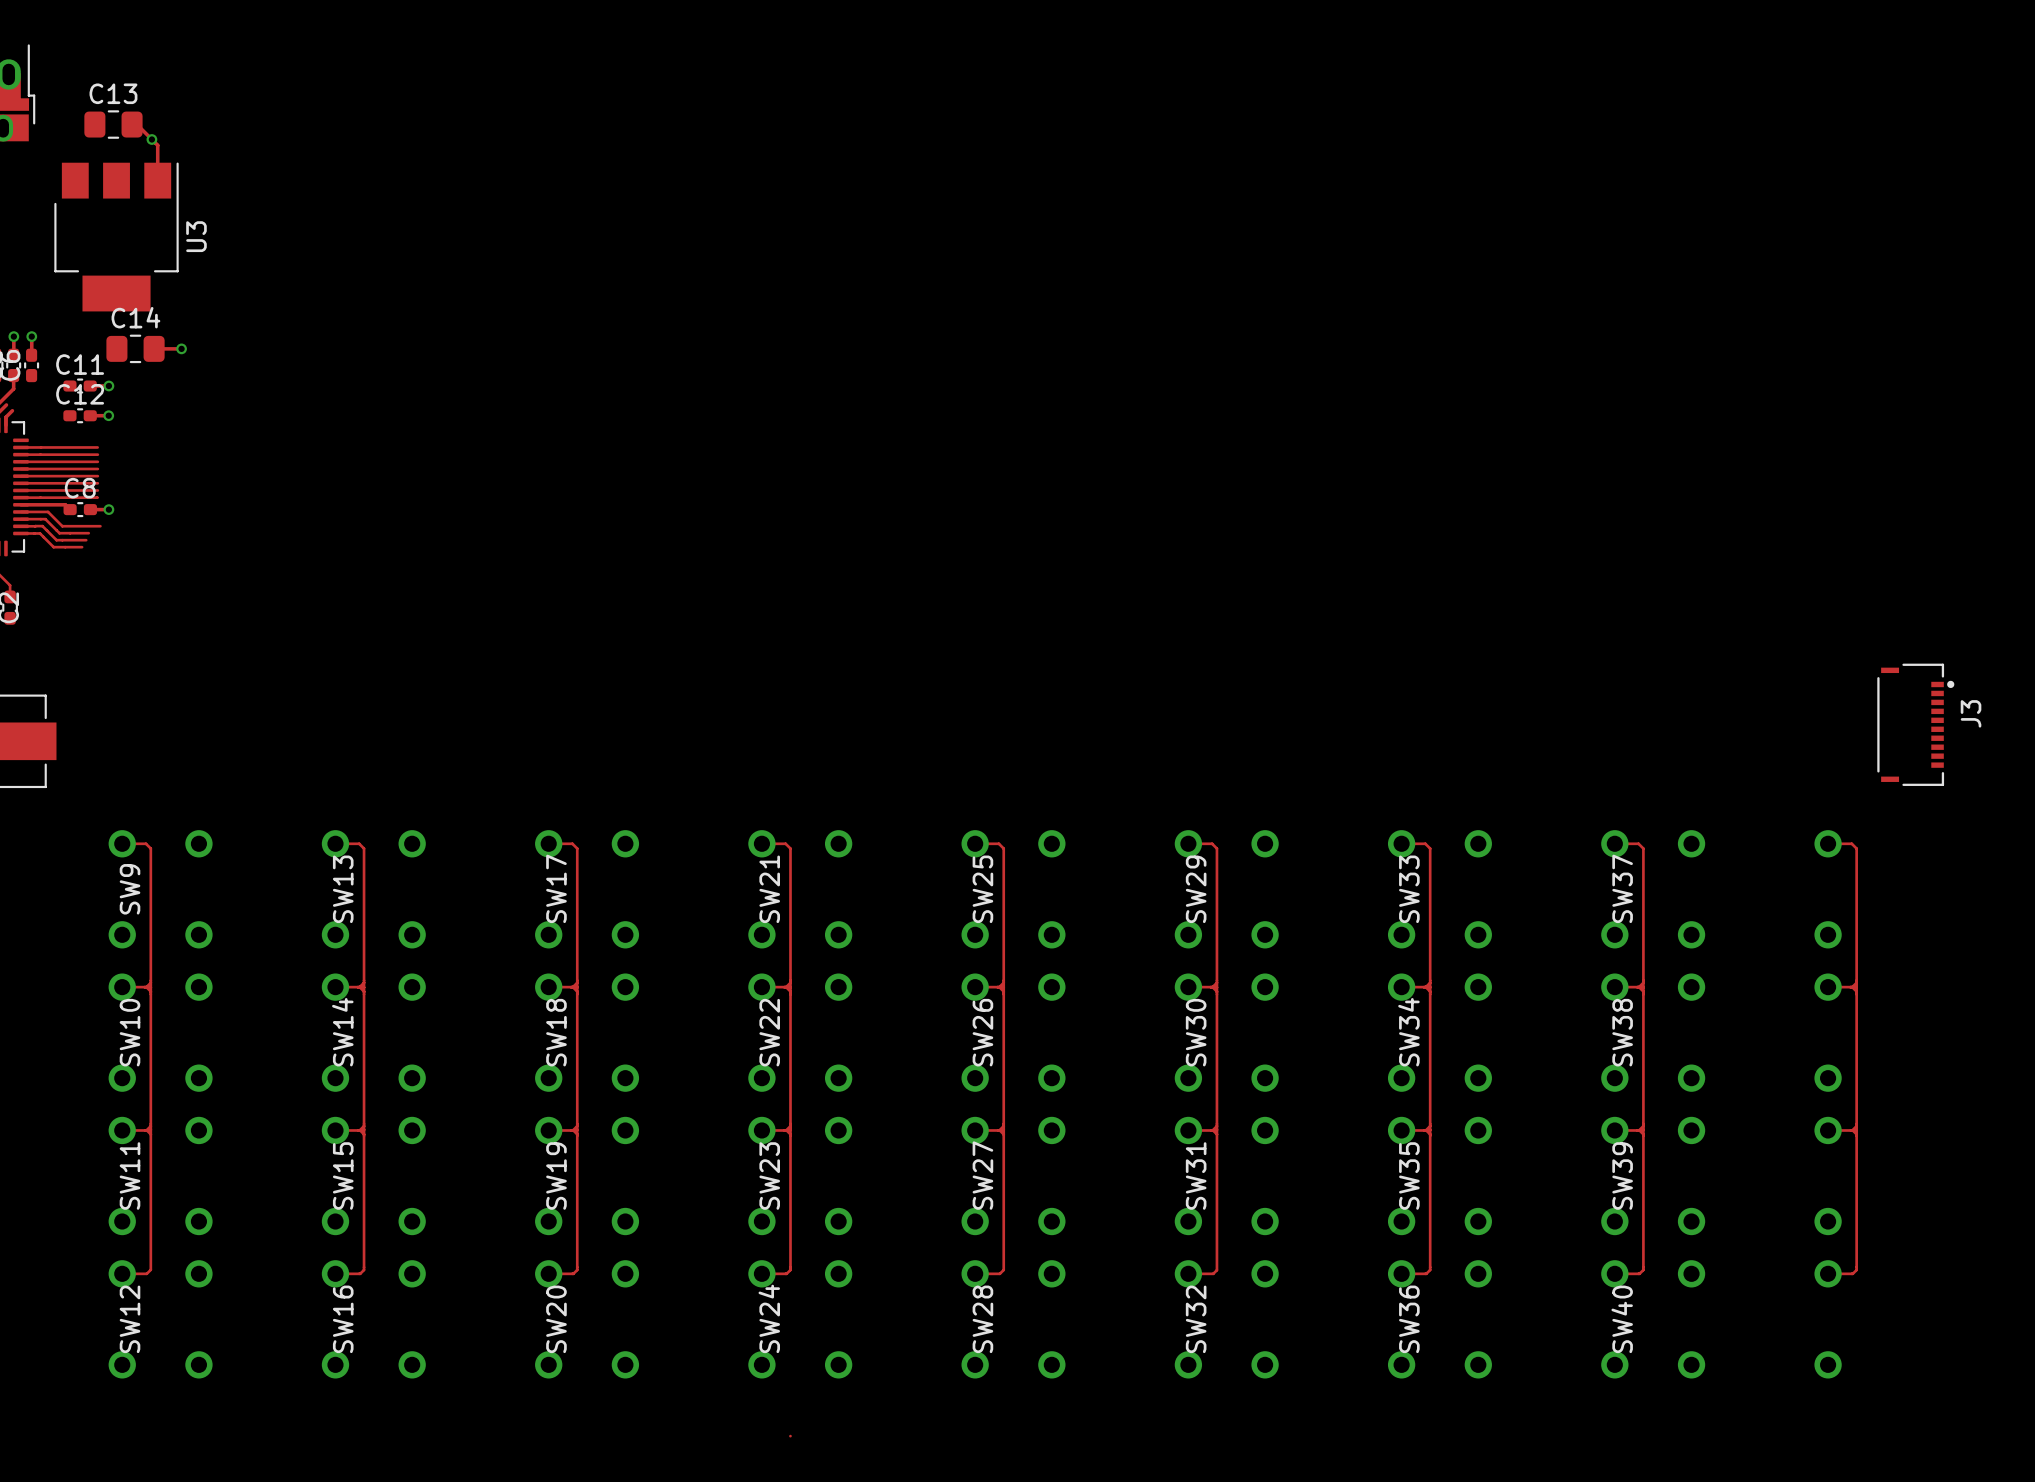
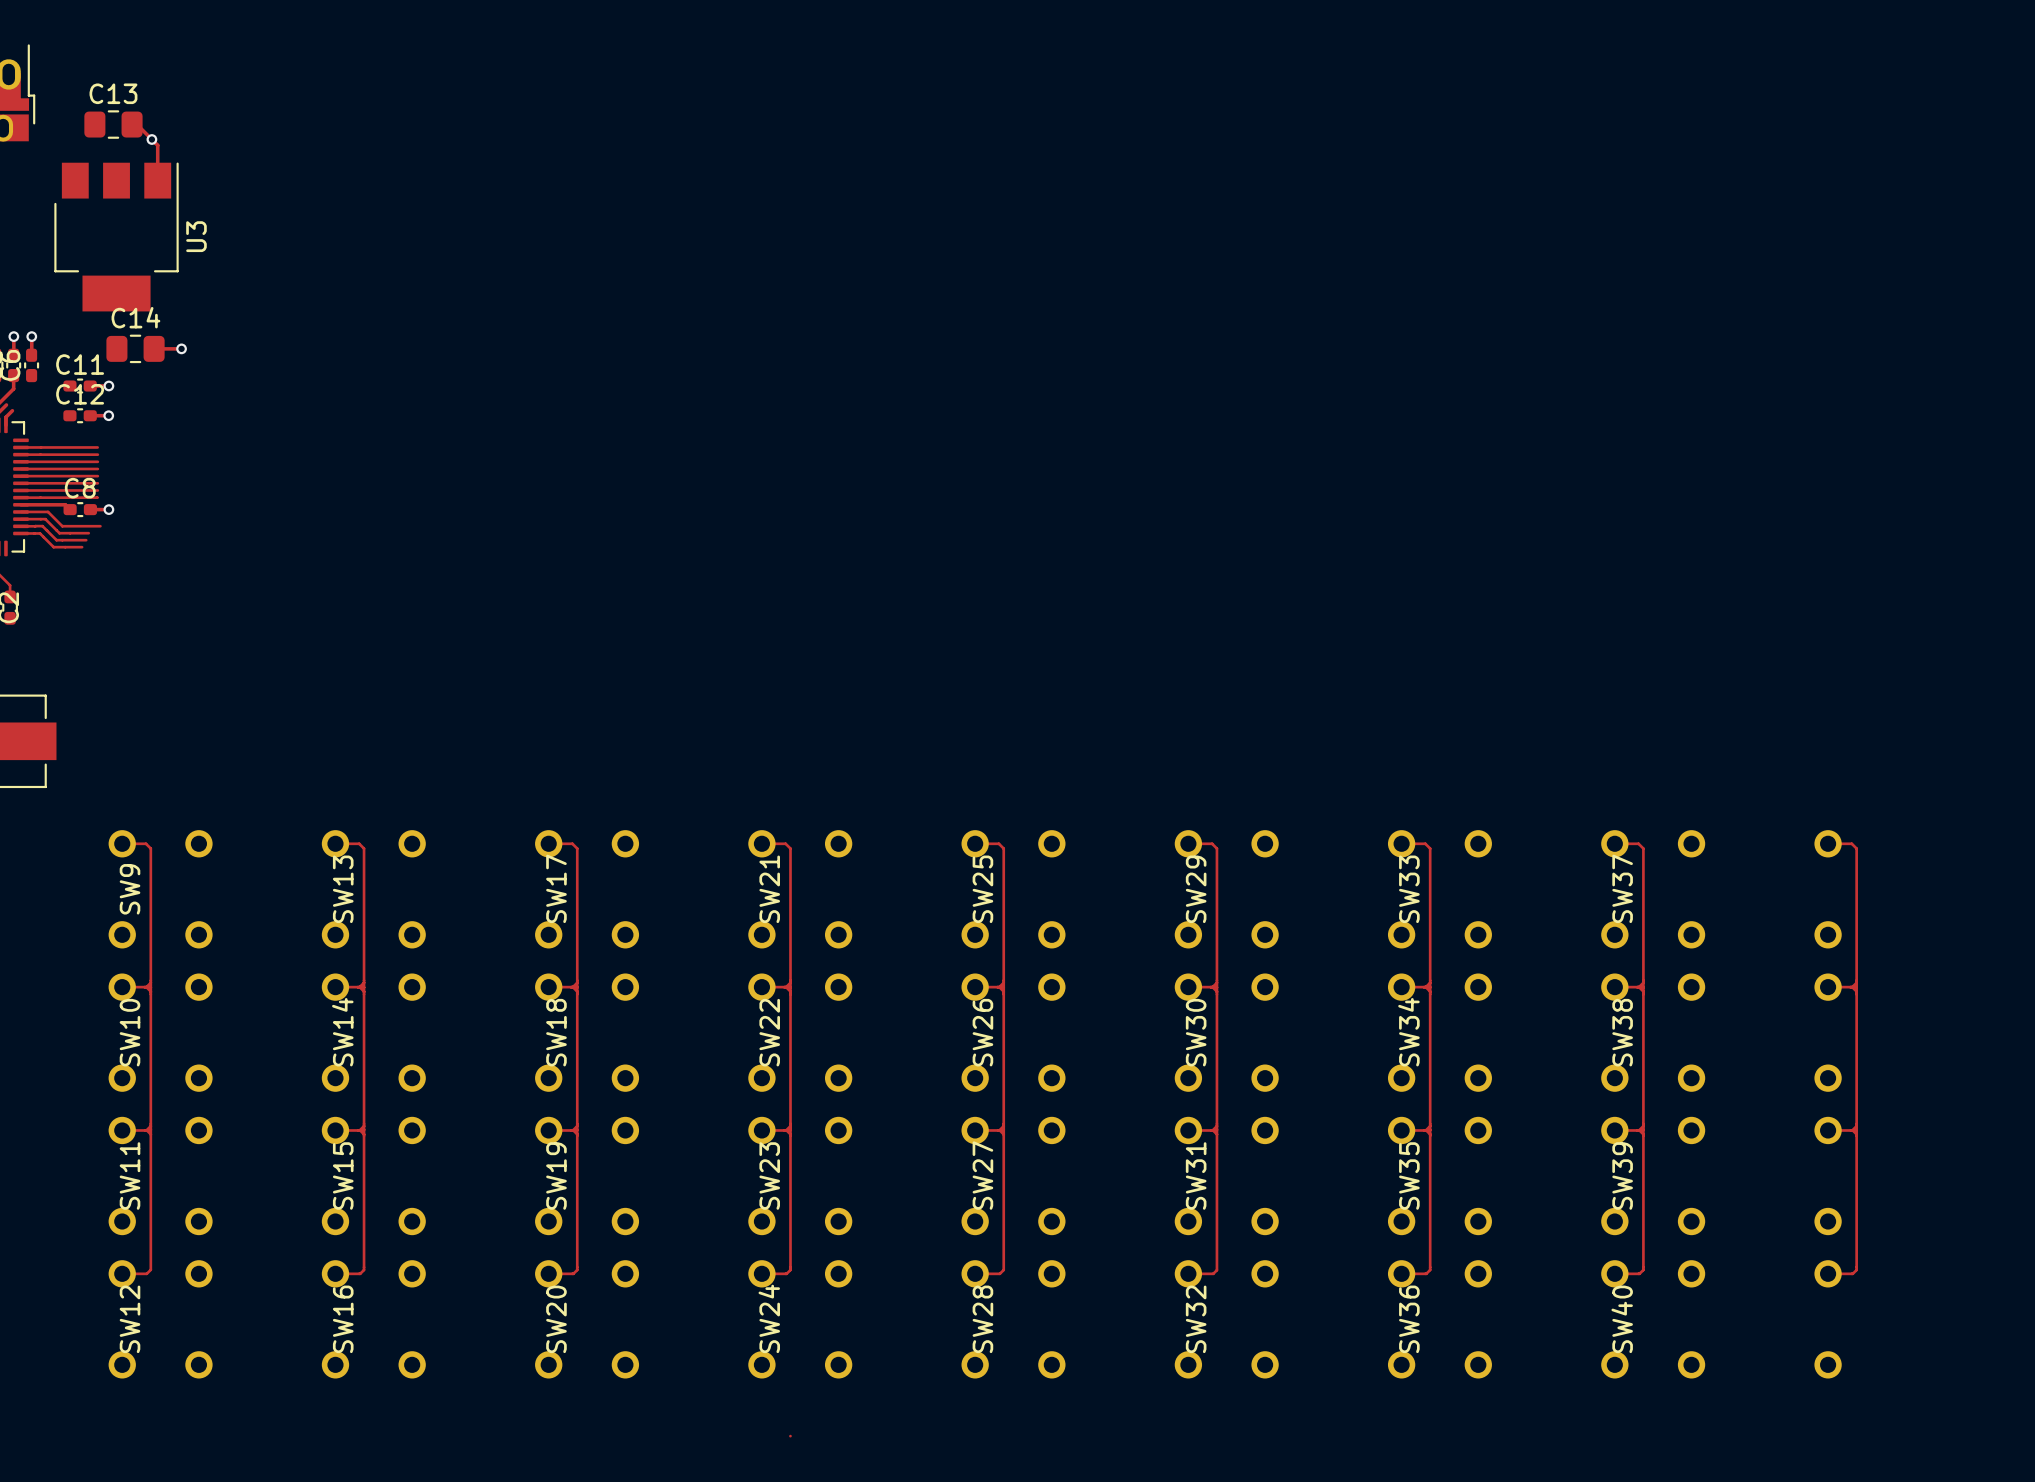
J3: (1915, 724) -> none

